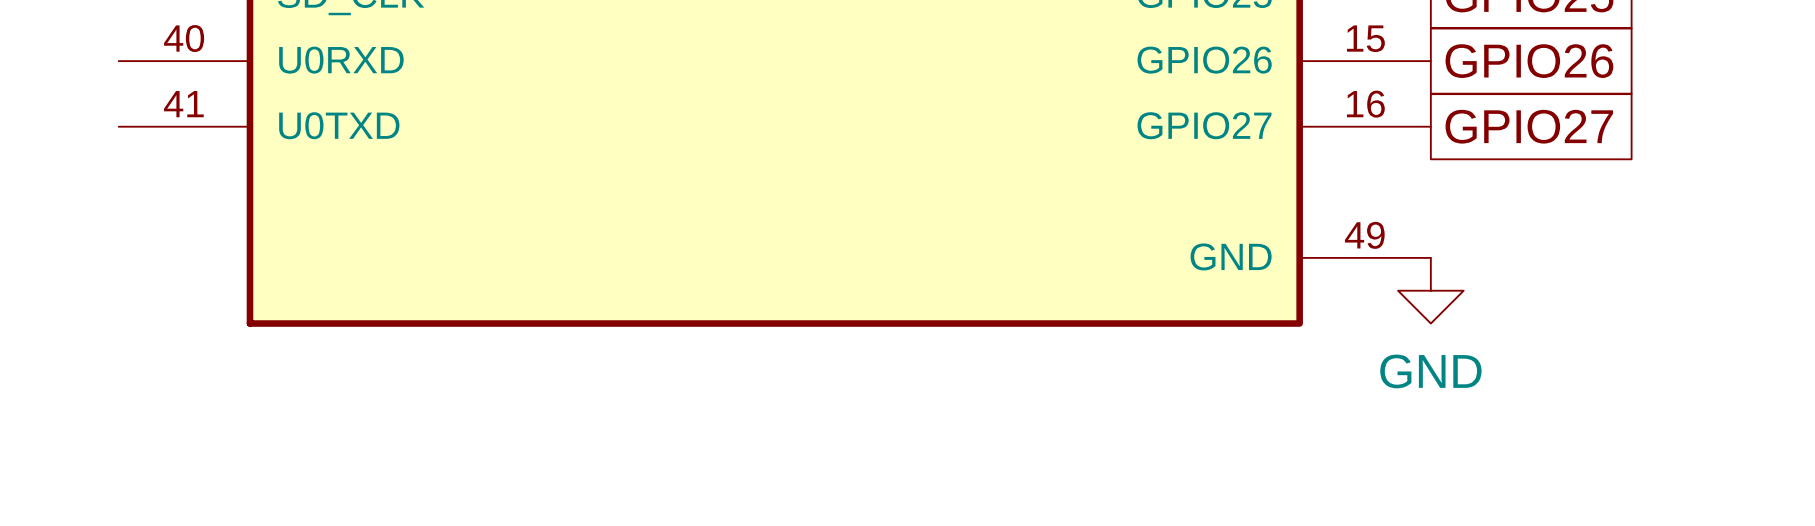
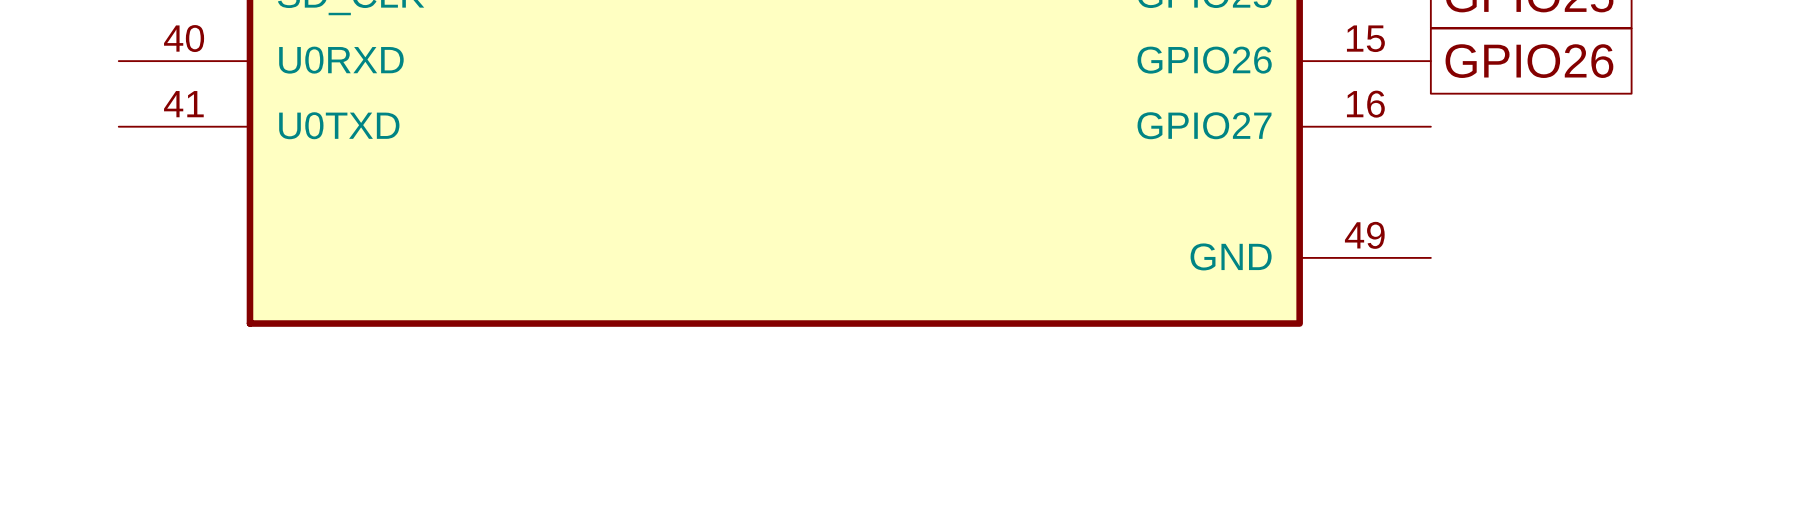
global label: GPIO27 (1529, 126) -> none
power symbol: GND (1430, 290) -> none

